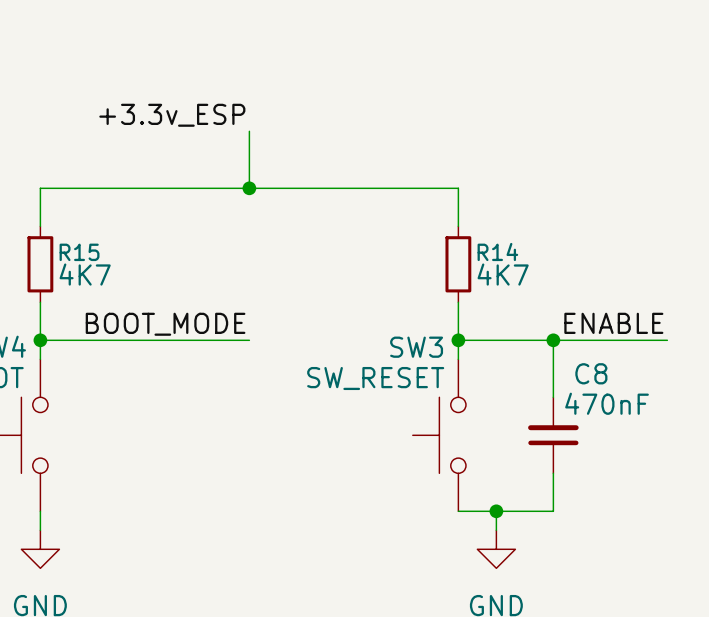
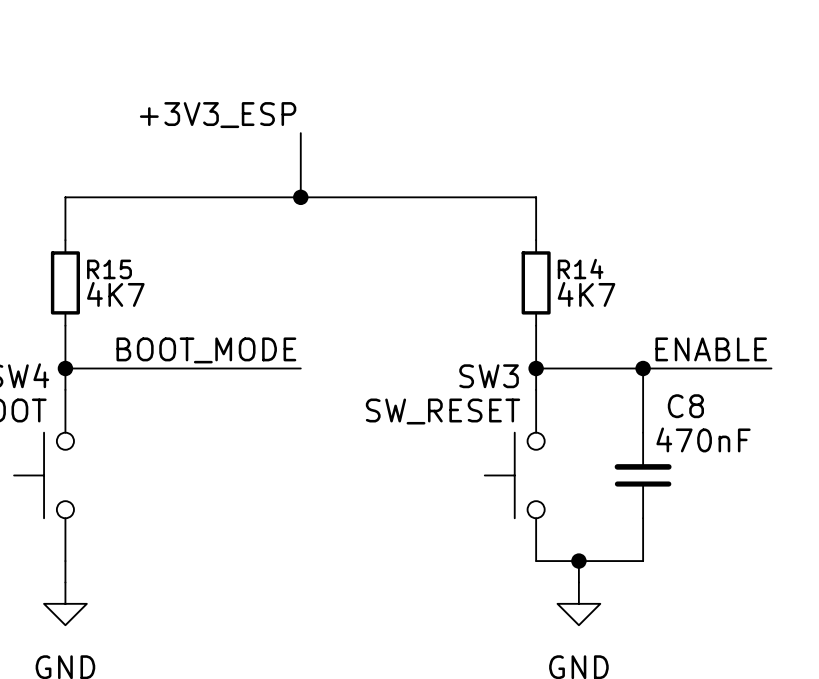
label: +3.3v_ESP (172, 115) -> +3V3_ESP (218, 115)

